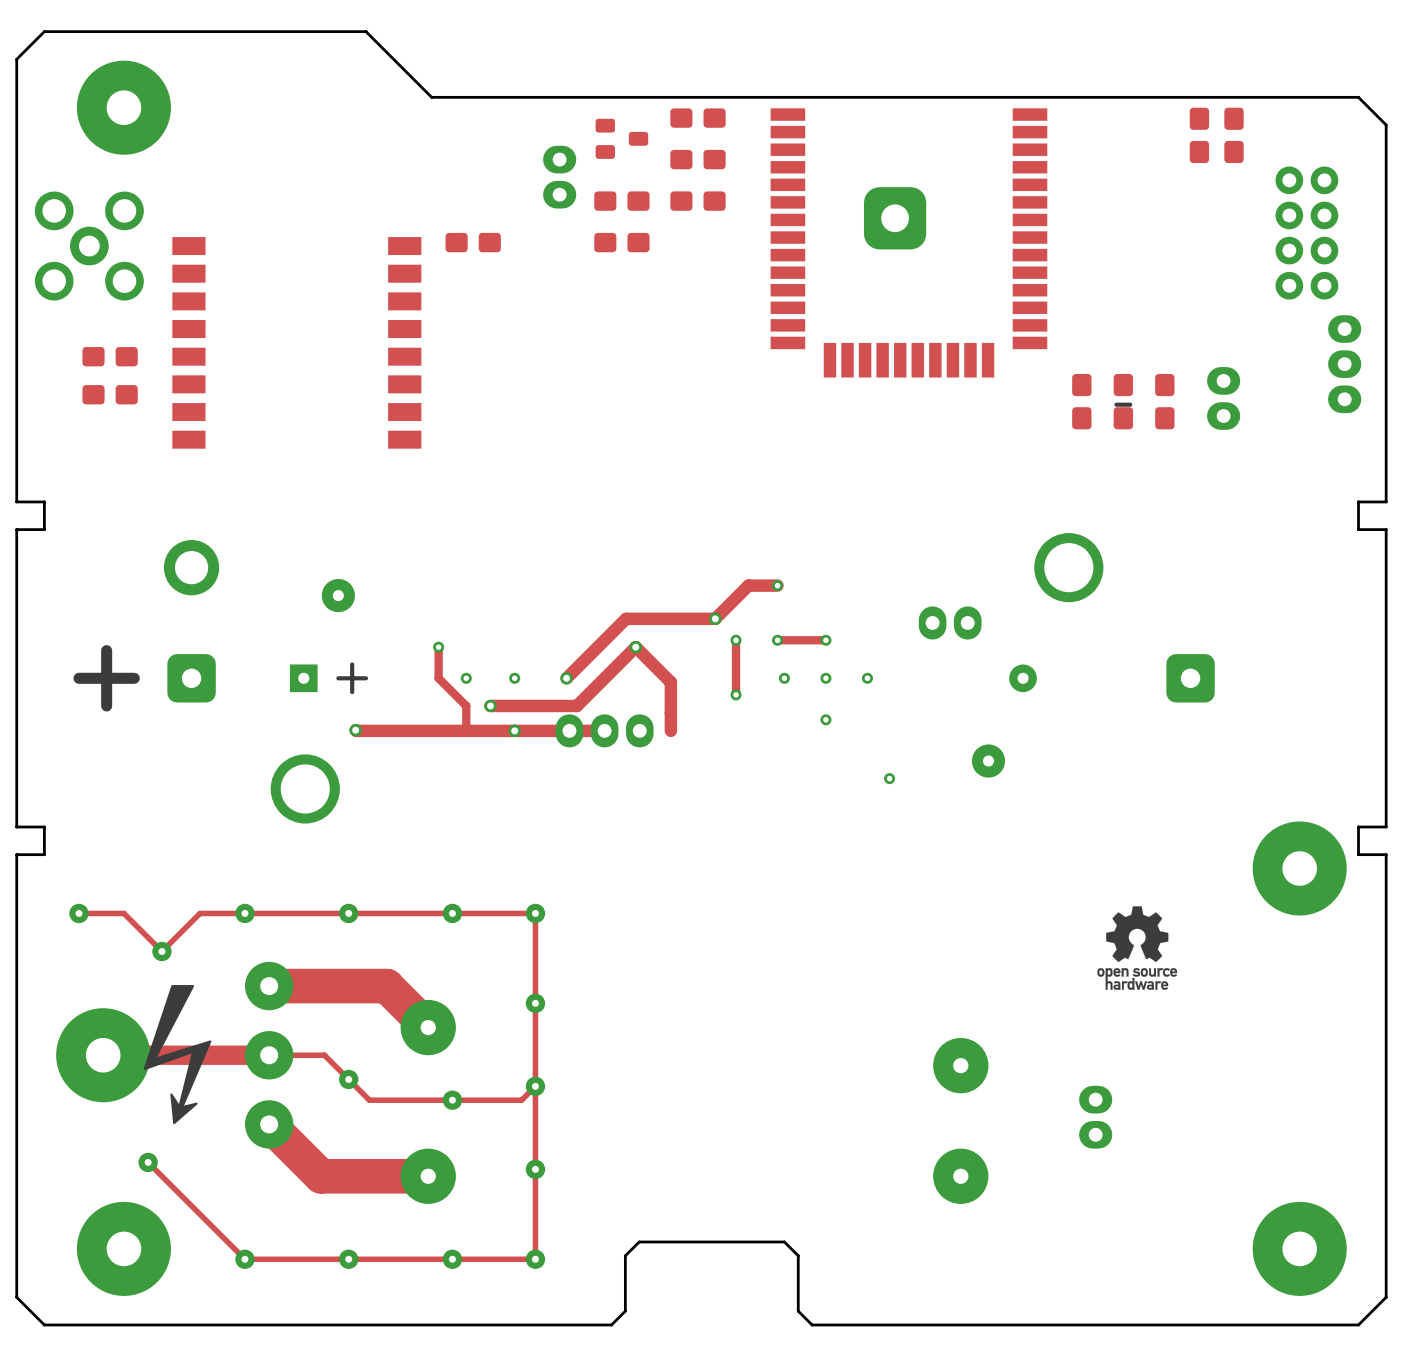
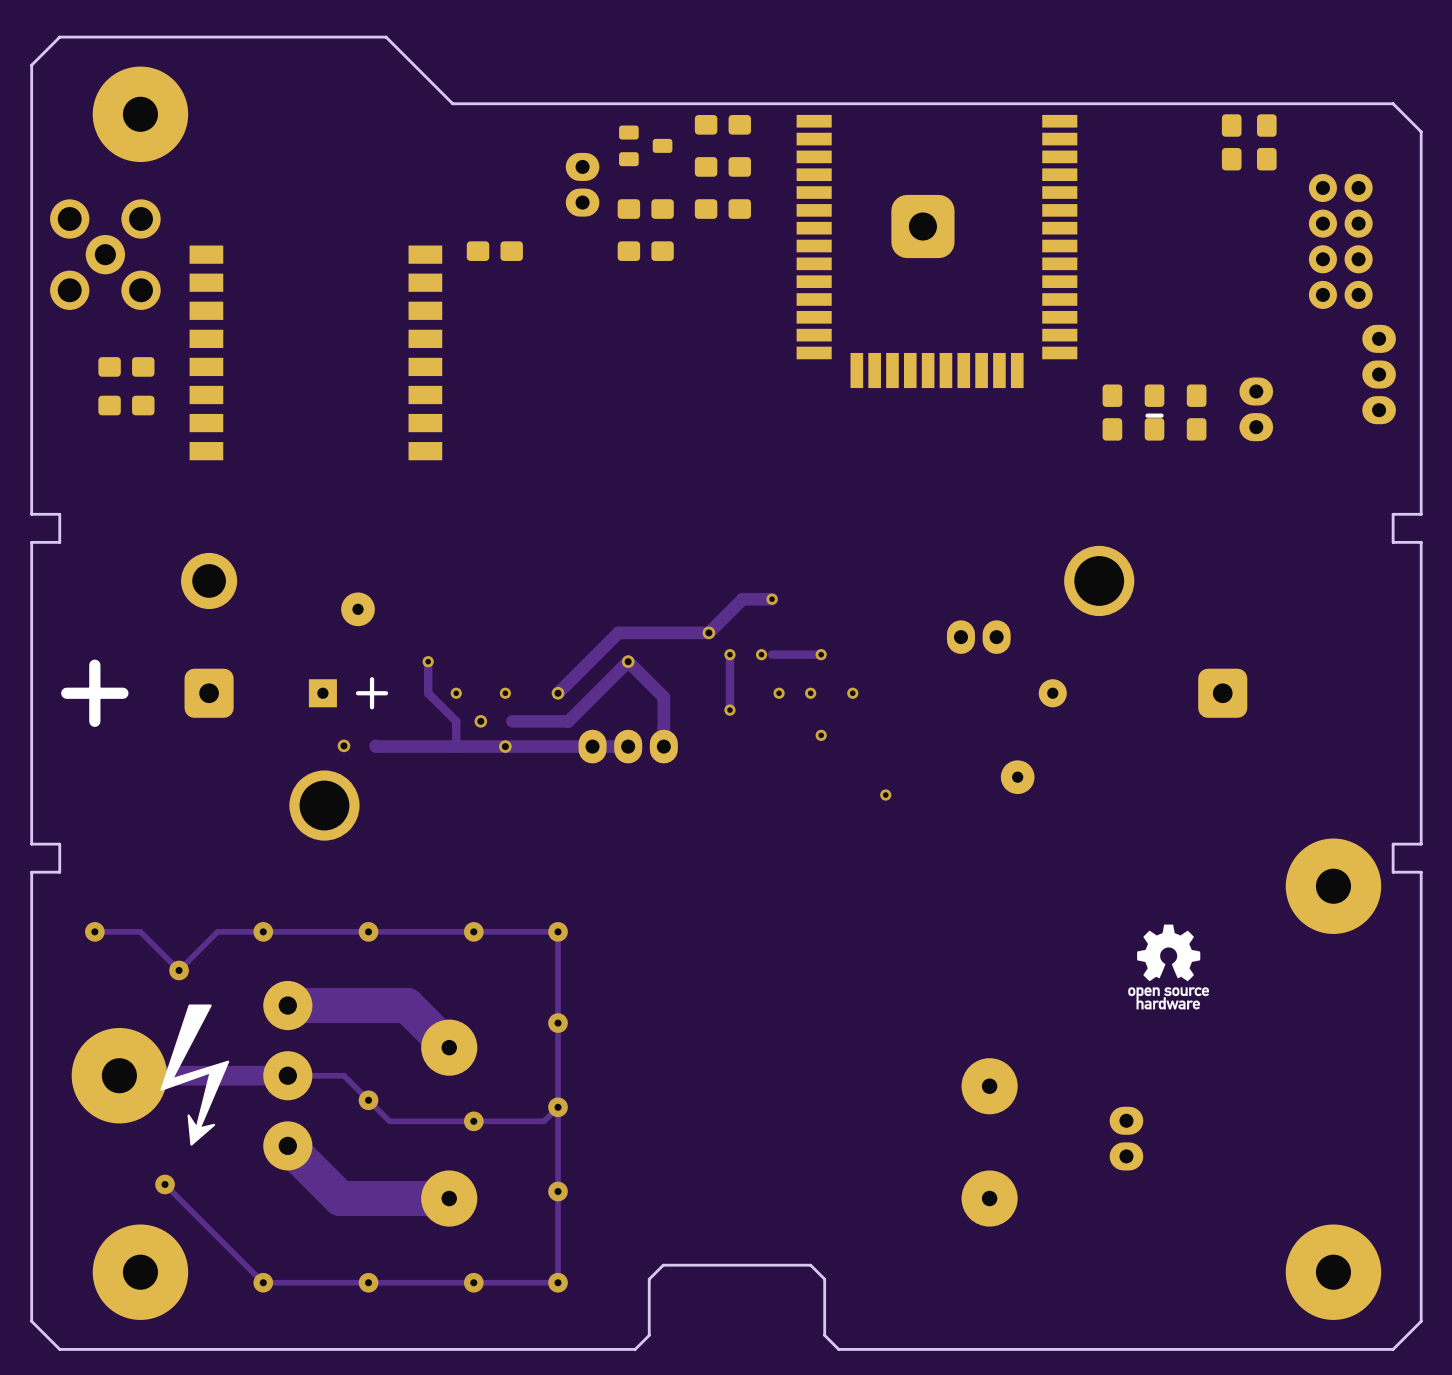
via: none -> (772, 599)
track: (777, 585) (748, 585) (715, 618) (684, 618) -> (772, 599) (742, 599) (708, 632)
via: (777, 585) -> none
track: (626, 618) (566, 678) -> (649, 632) (618, 632) (558, 693)
via: none -> (708, 632)
via: (715, 618) -> none
via: none -> (729, 654)
track: (736, 640) (736, 694) -> (729, 654) (729, 710)
via: (777, 640) -> none
track: (794, 640) (825, 640) -> (772, 654) (803, 654)
via: none -> (821, 654)
via: (825, 640) -> none
via: none -> (428, 661)
track: (438, 647) (438, 678) (466, 705) (466, 730) -> (428, 661) (428, 693) (456, 721) (456, 746)
via: (438, 647) -> none
via: none -> (628, 661)
via: (635, 647) -> none
line: (106, 650) (106, 705) -> (94, 665) (94, 721)
line: (106, 678) (134, 678) -> (66, 693) (94, 693)
via: none -> (456, 693)
via: (466, 678) -> none
via: none -> (505, 693)
via: (514, 678) -> none
via: none -> (558, 693)
via: (566, 678) -> none
via: none -> (779, 693)
via: (867, 678) -> none
via: none -> (729, 710)
via: (736, 694) -> none
via: none -> (480, 721)
via: (490, 705) -> none
track: (545, 705) (576, 705) (635, 647) (670, 682) (670, 730) -> (568, 721) (628, 661) (663, 697) (663, 746)
via position: (825, 719) -> (821, 735)
via position: (355, 730) -> (343, 745)
via: none -> (505, 746)
via: (514, 730) -> none
via position: (889, 778) -> (885, 795)

